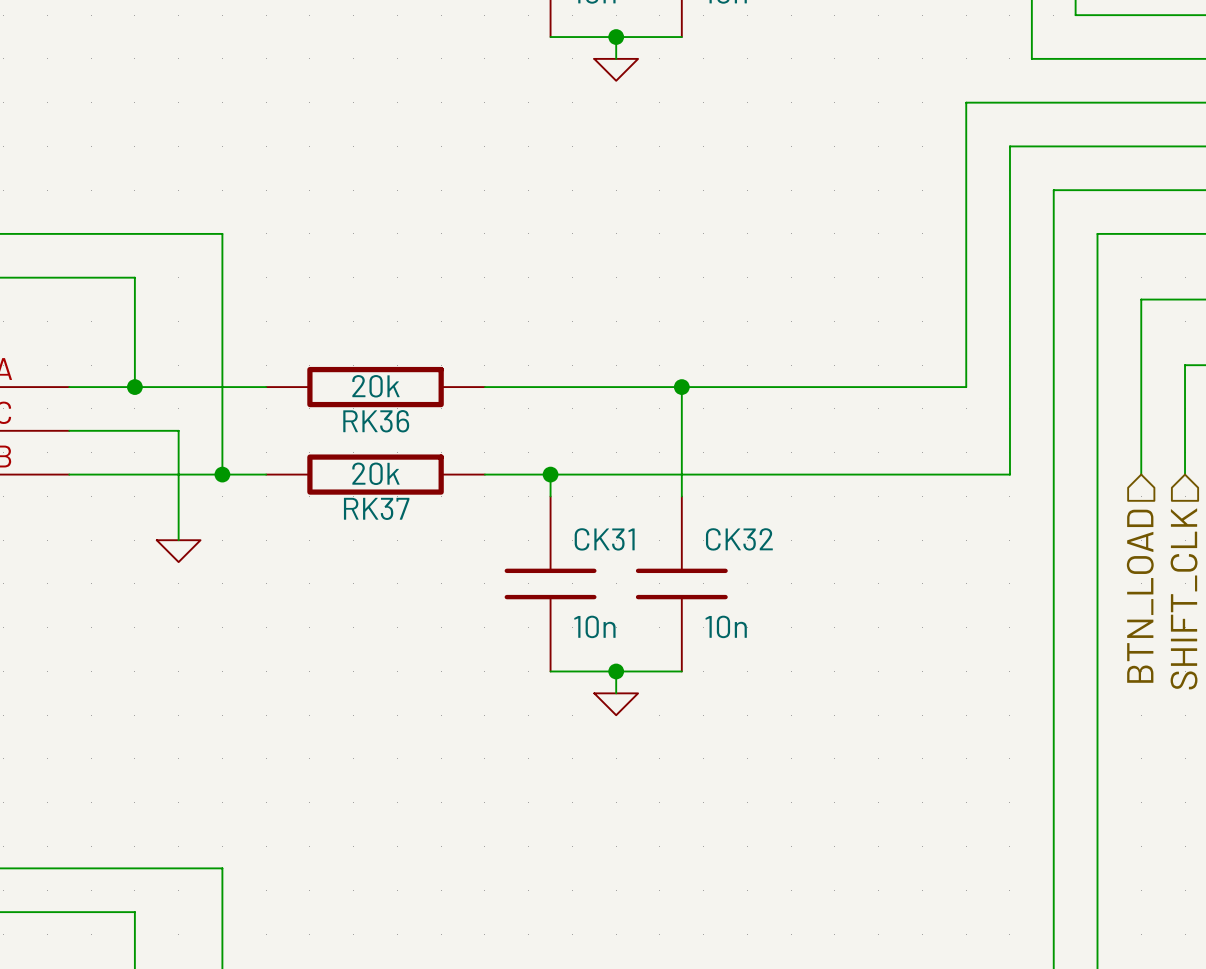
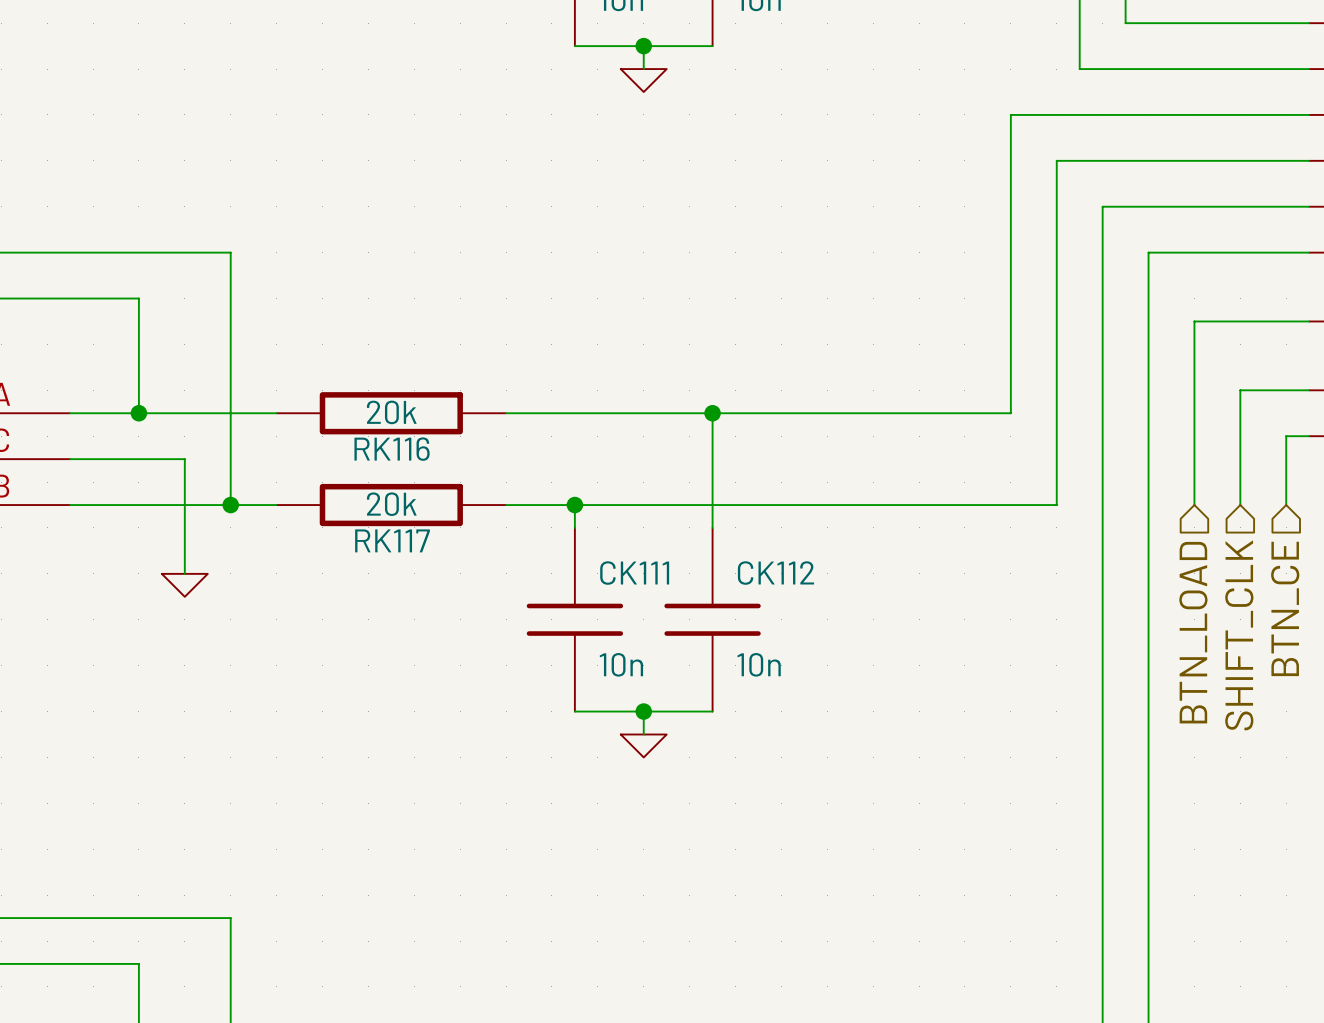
RK36 name: RK36 (376, 421) -> RK116 (392, 449)
RK37 name: RK37 (376, 508) -> RK117 (392, 540)
CK31 name: CK31 (604, 539) -> CK111 (634, 573)
CK32 name: CK32 (739, 539) -> CK112 (775, 573)

